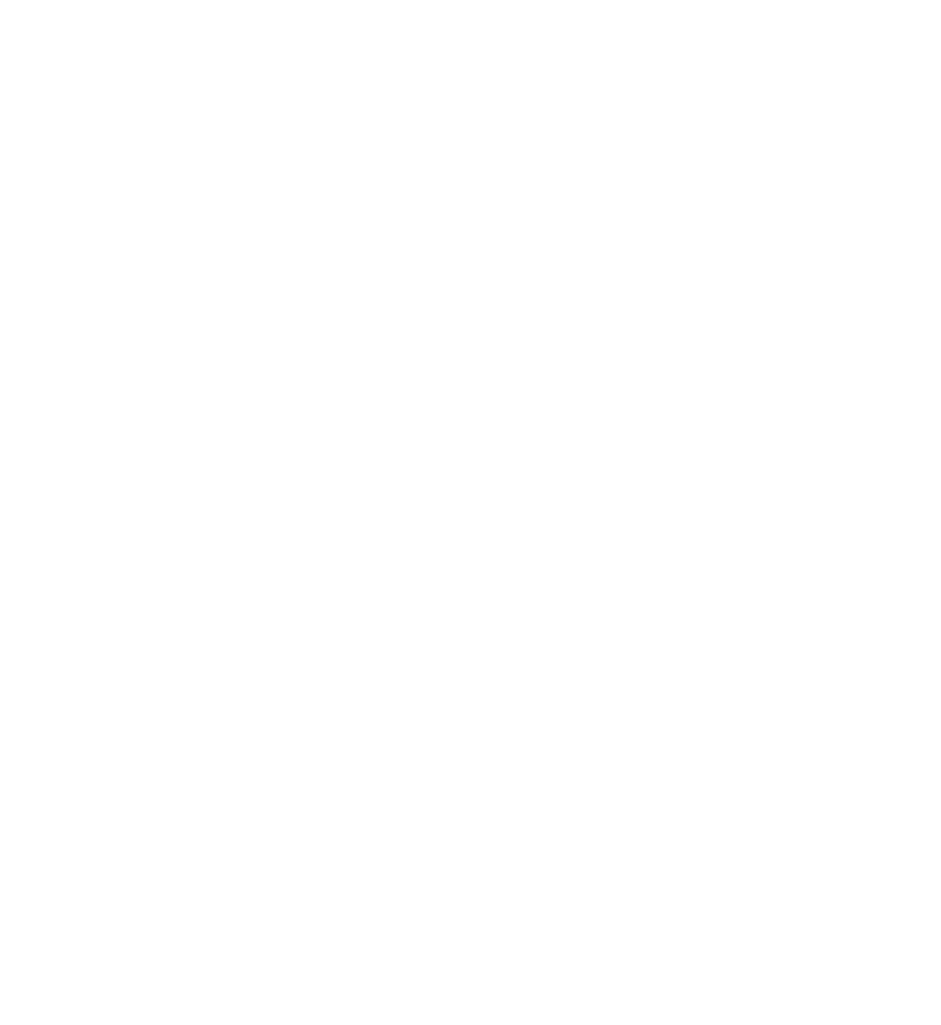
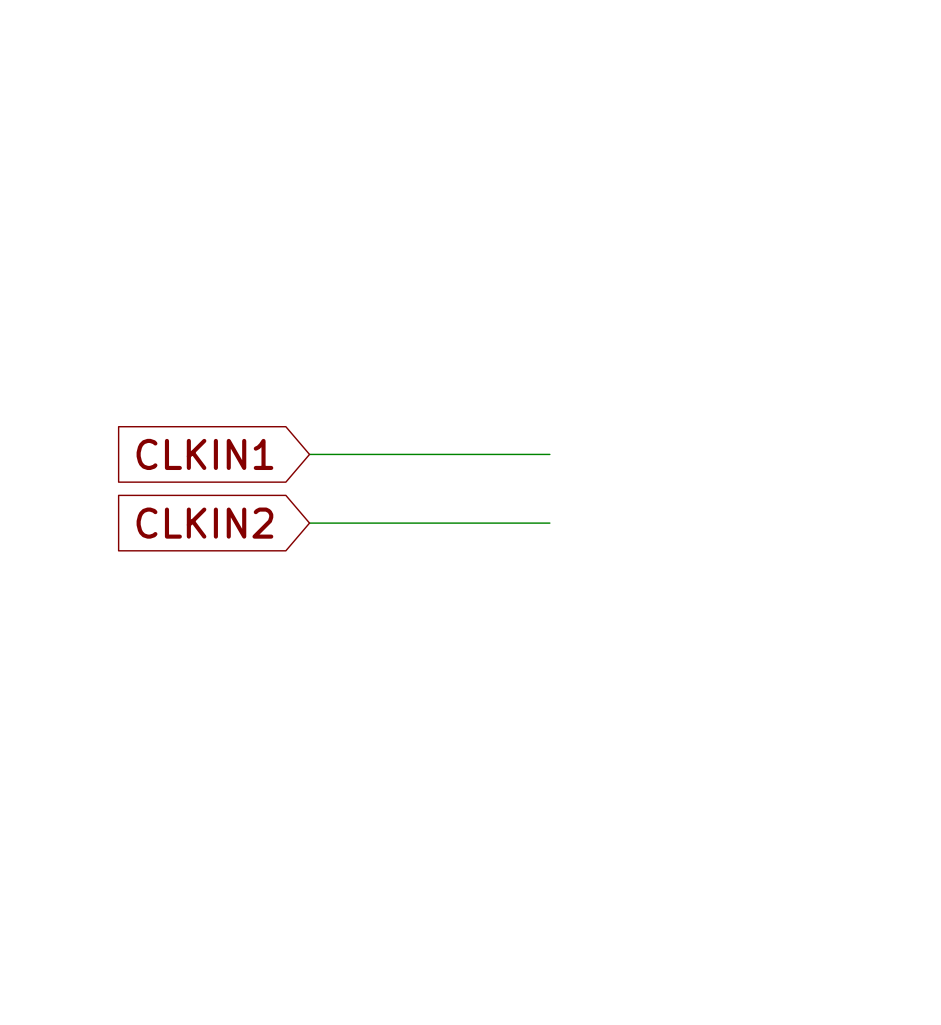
global label: none -> CLKIN1 (204, 454)
wire: none -> (309, 454) (549, 454)
global label: none -> CLKIN2 (204, 523)
wire: none -> (309, 523) (549, 523)

